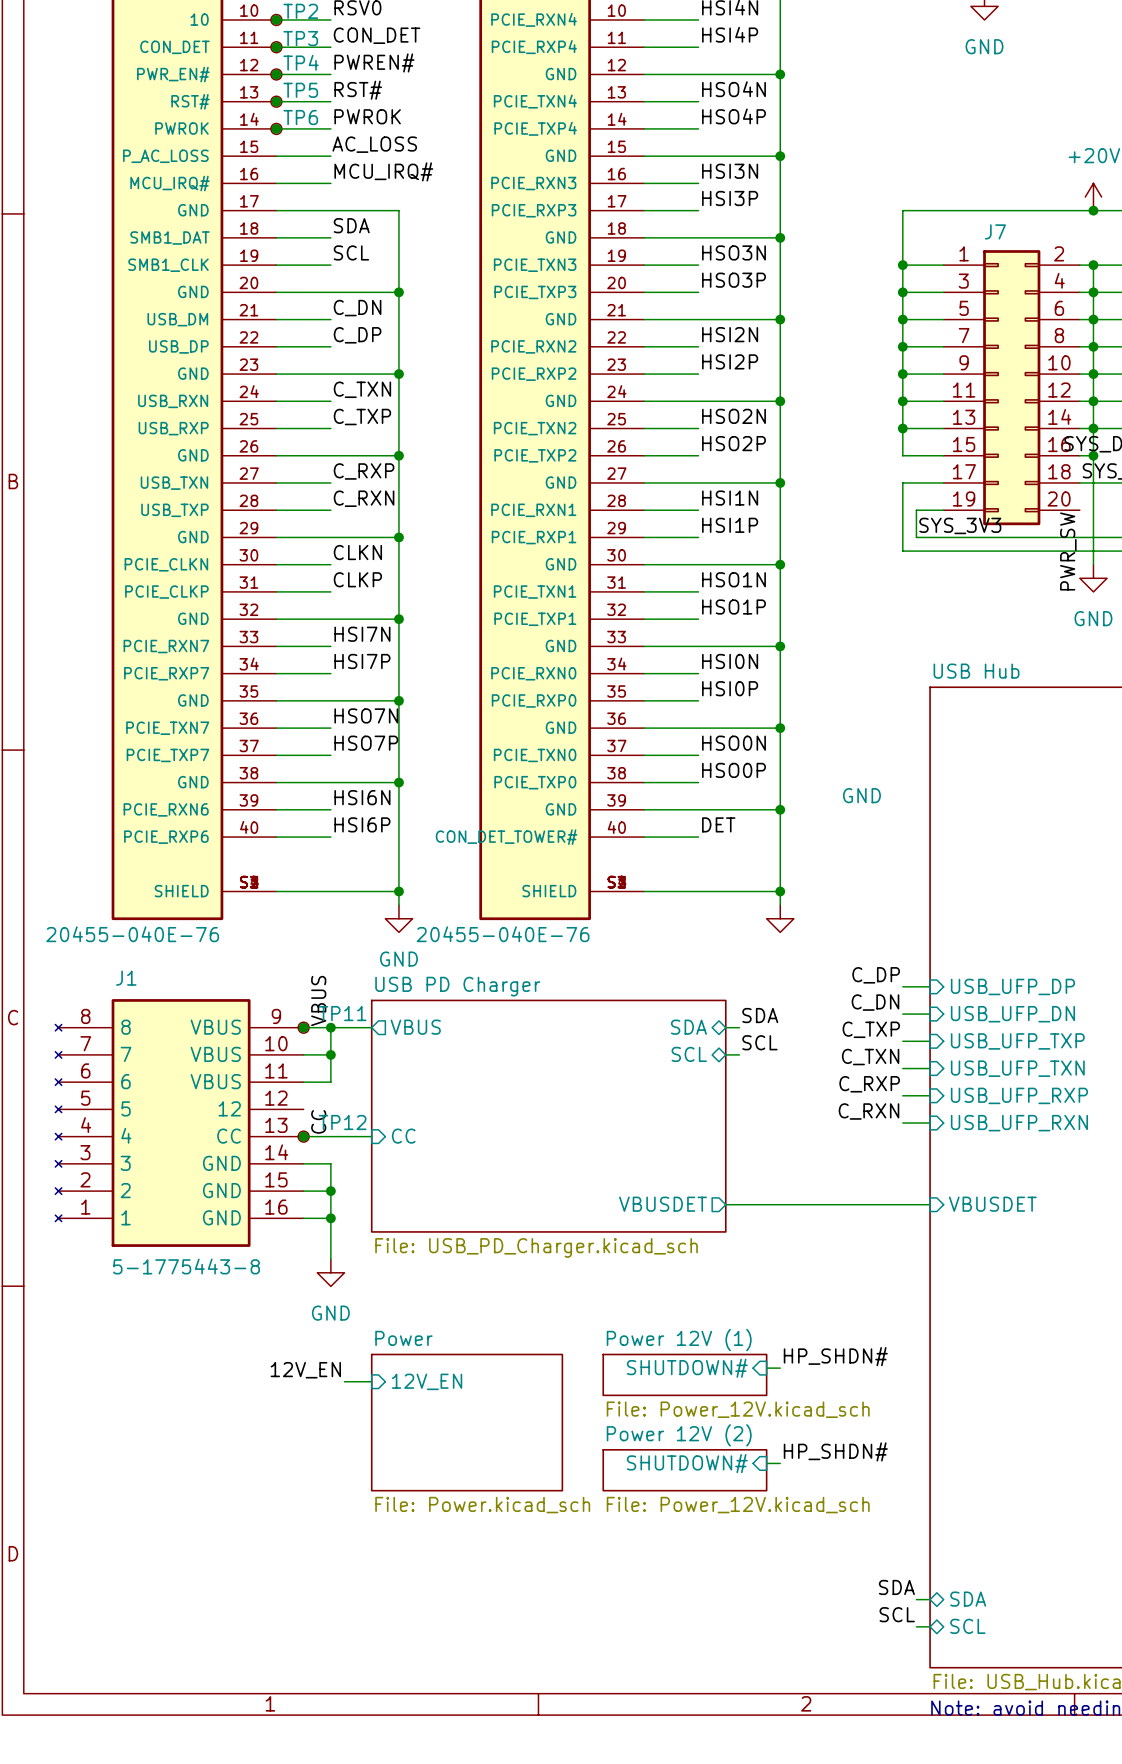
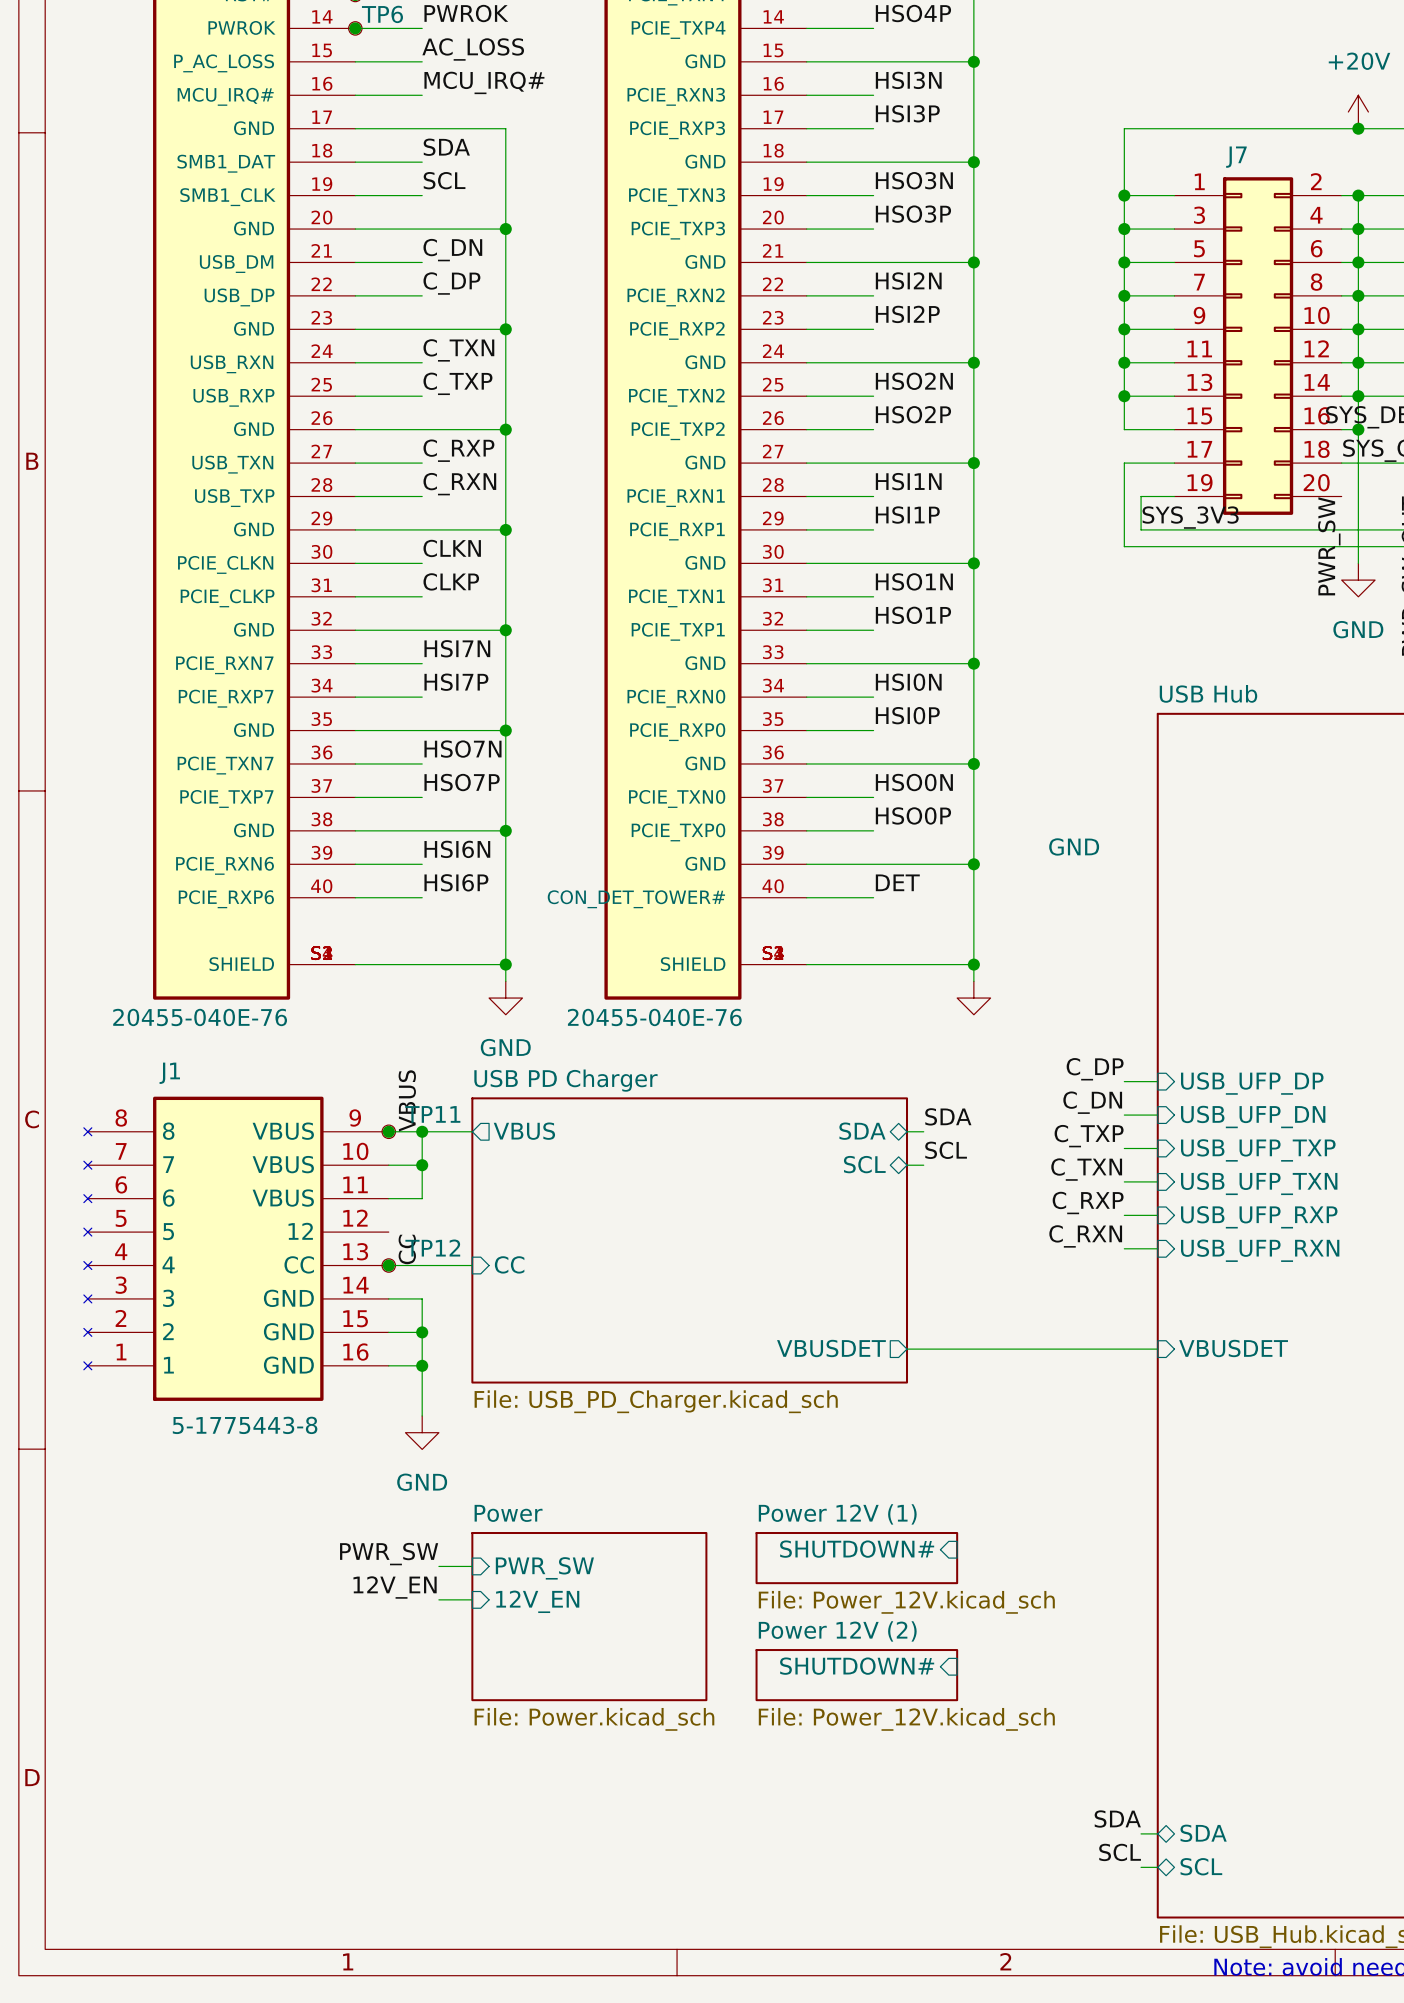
label: HP_SHDN# (835, 1356) -> none
wire: (766, 1368) (780, 1368) -> none
label: 12V_EN (305, 1370) -> PWR_SW (389, 1554)
sheet pin: 12V_EN (427, 1381) -> PWR_SW (544, 1568)
label: none -> 12V_EN (395, 1587)
wire: none -> (438, 1599) (472, 1599)
sheet pin: none -> 12V_EN (537, 1601)
label: HP_SHDN# (835, 1451) -> none
wire: (766, 1463) (780, 1463) -> none

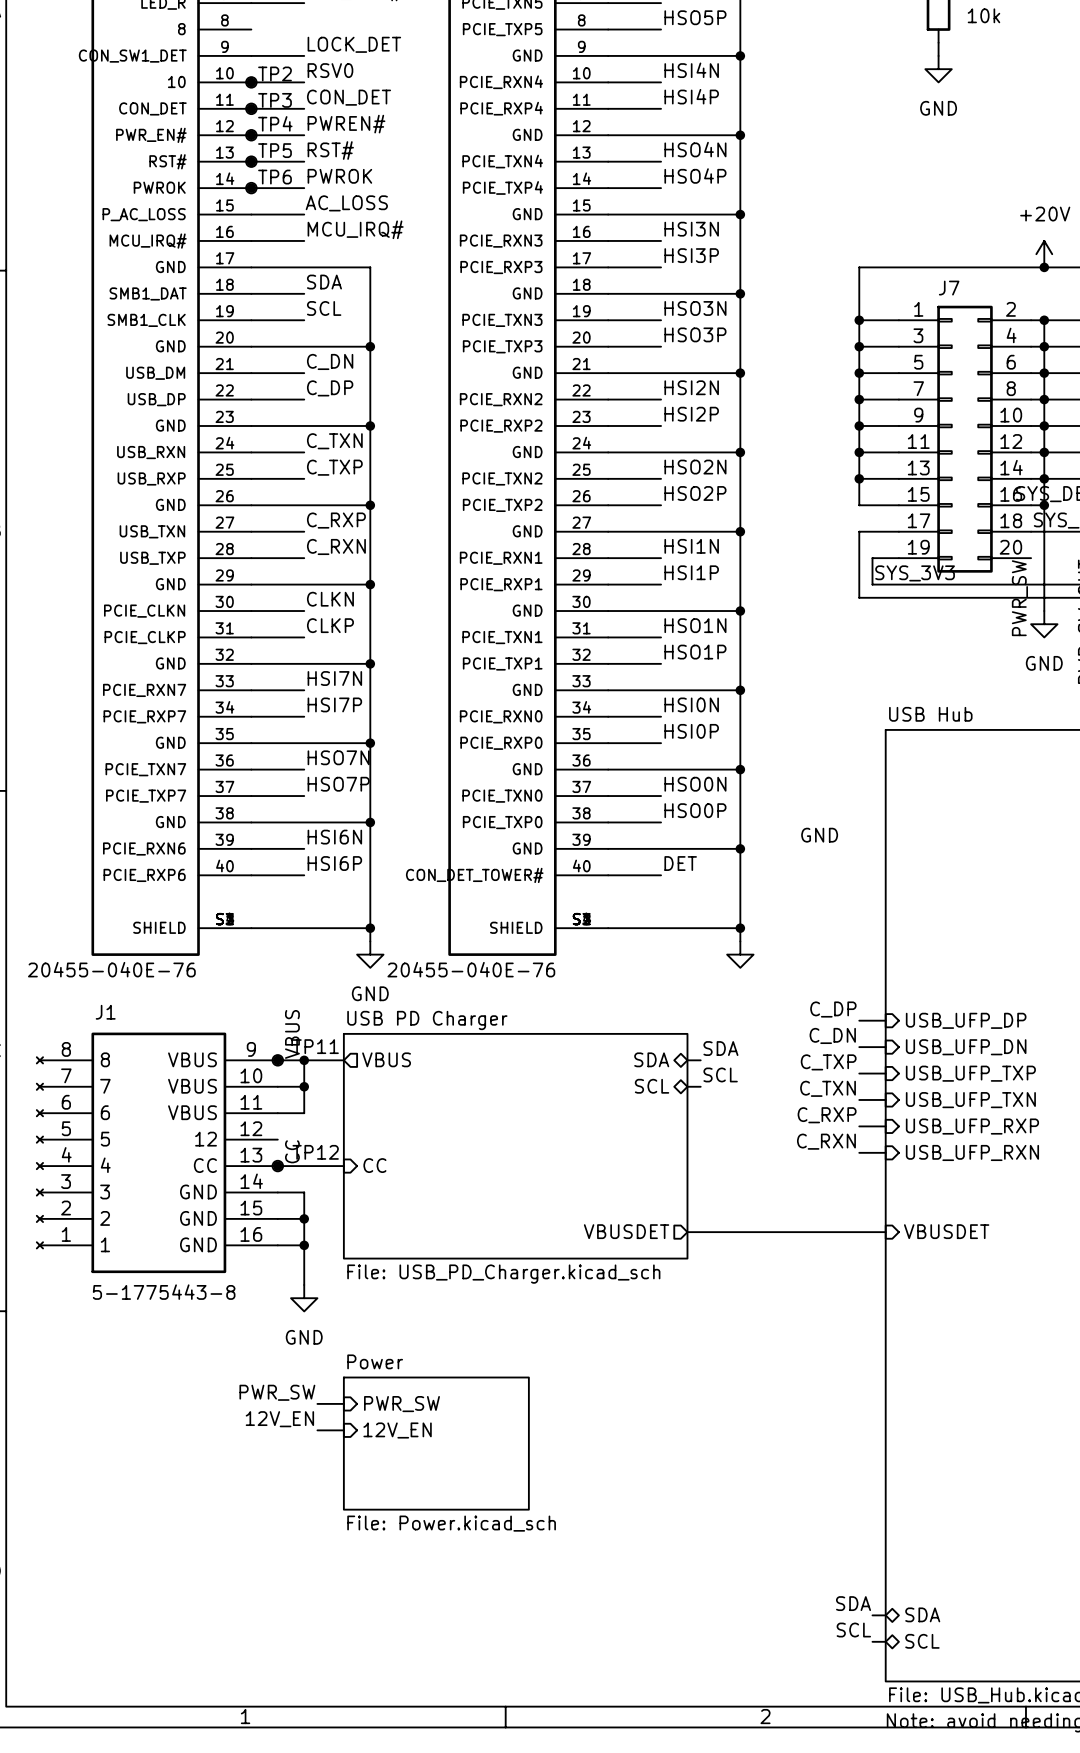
sheet pin: SHUTDOWN# (857, 1549) -> none
sheet Power 12V (1): File: Power_12V.kicad_sch (856, 1558) -> none
sheet pin: SHUTDOWN# (857, 1666) -> none
sheet Power 12V (2): File: Power_12V.kicad_sch (856, 1675) -> none

